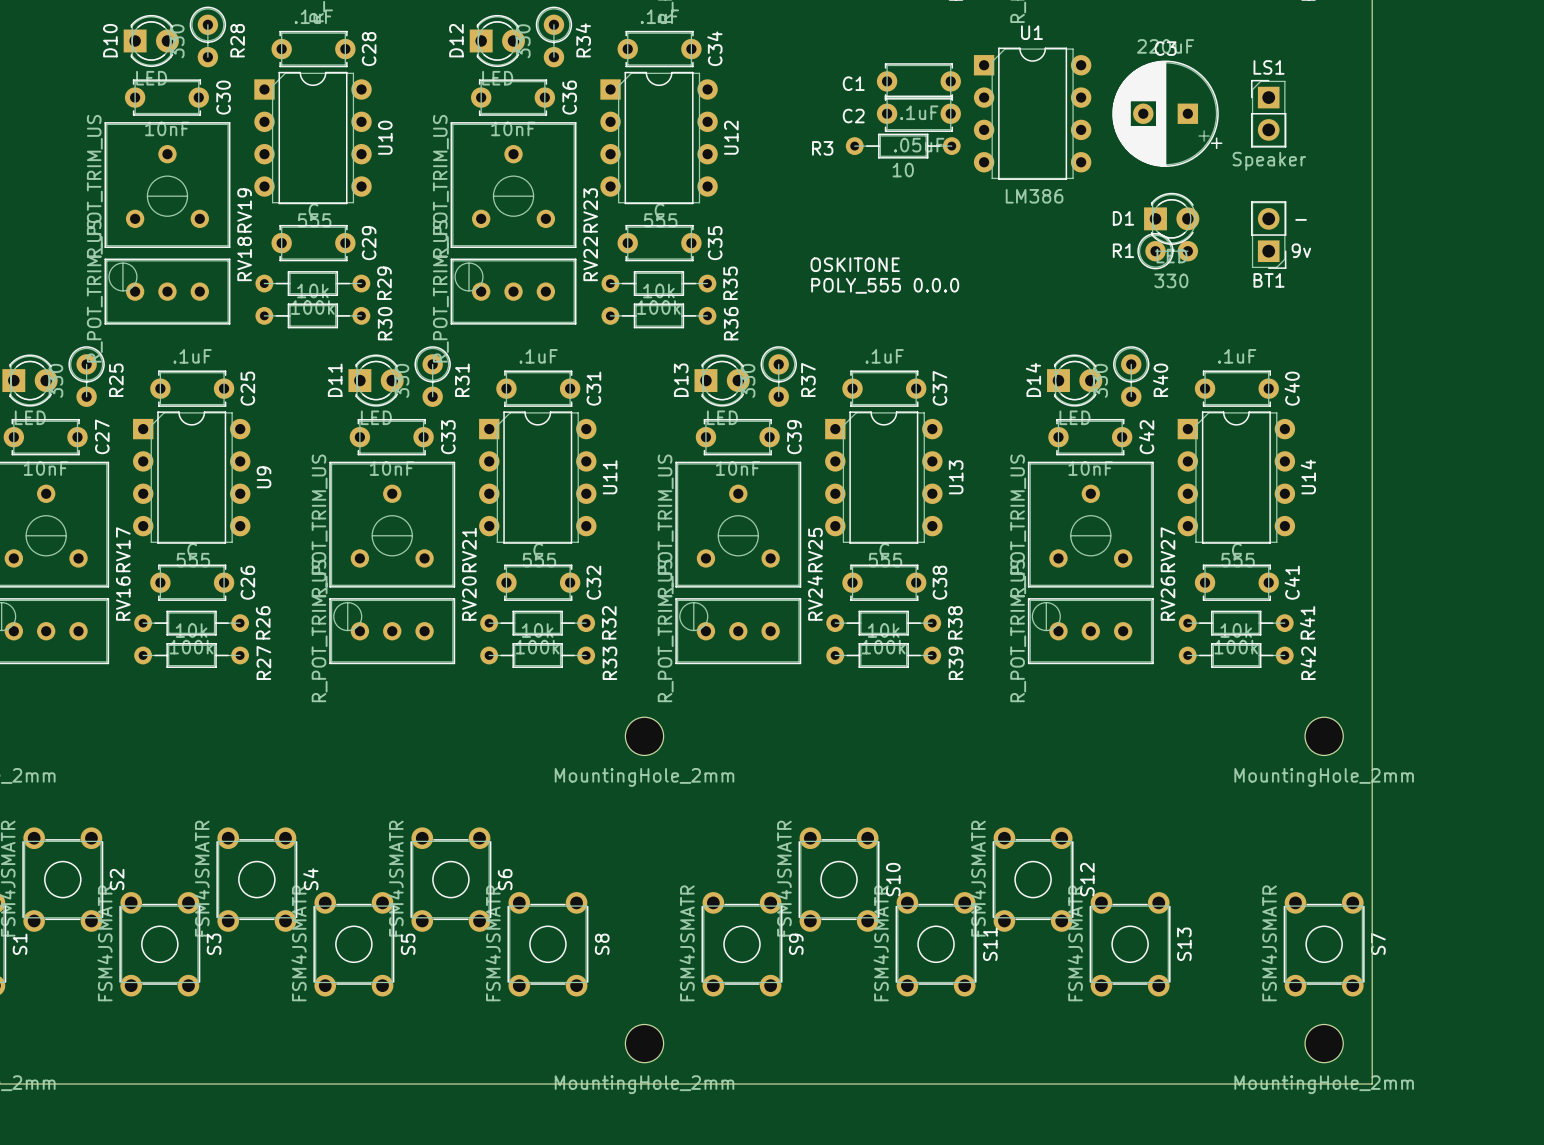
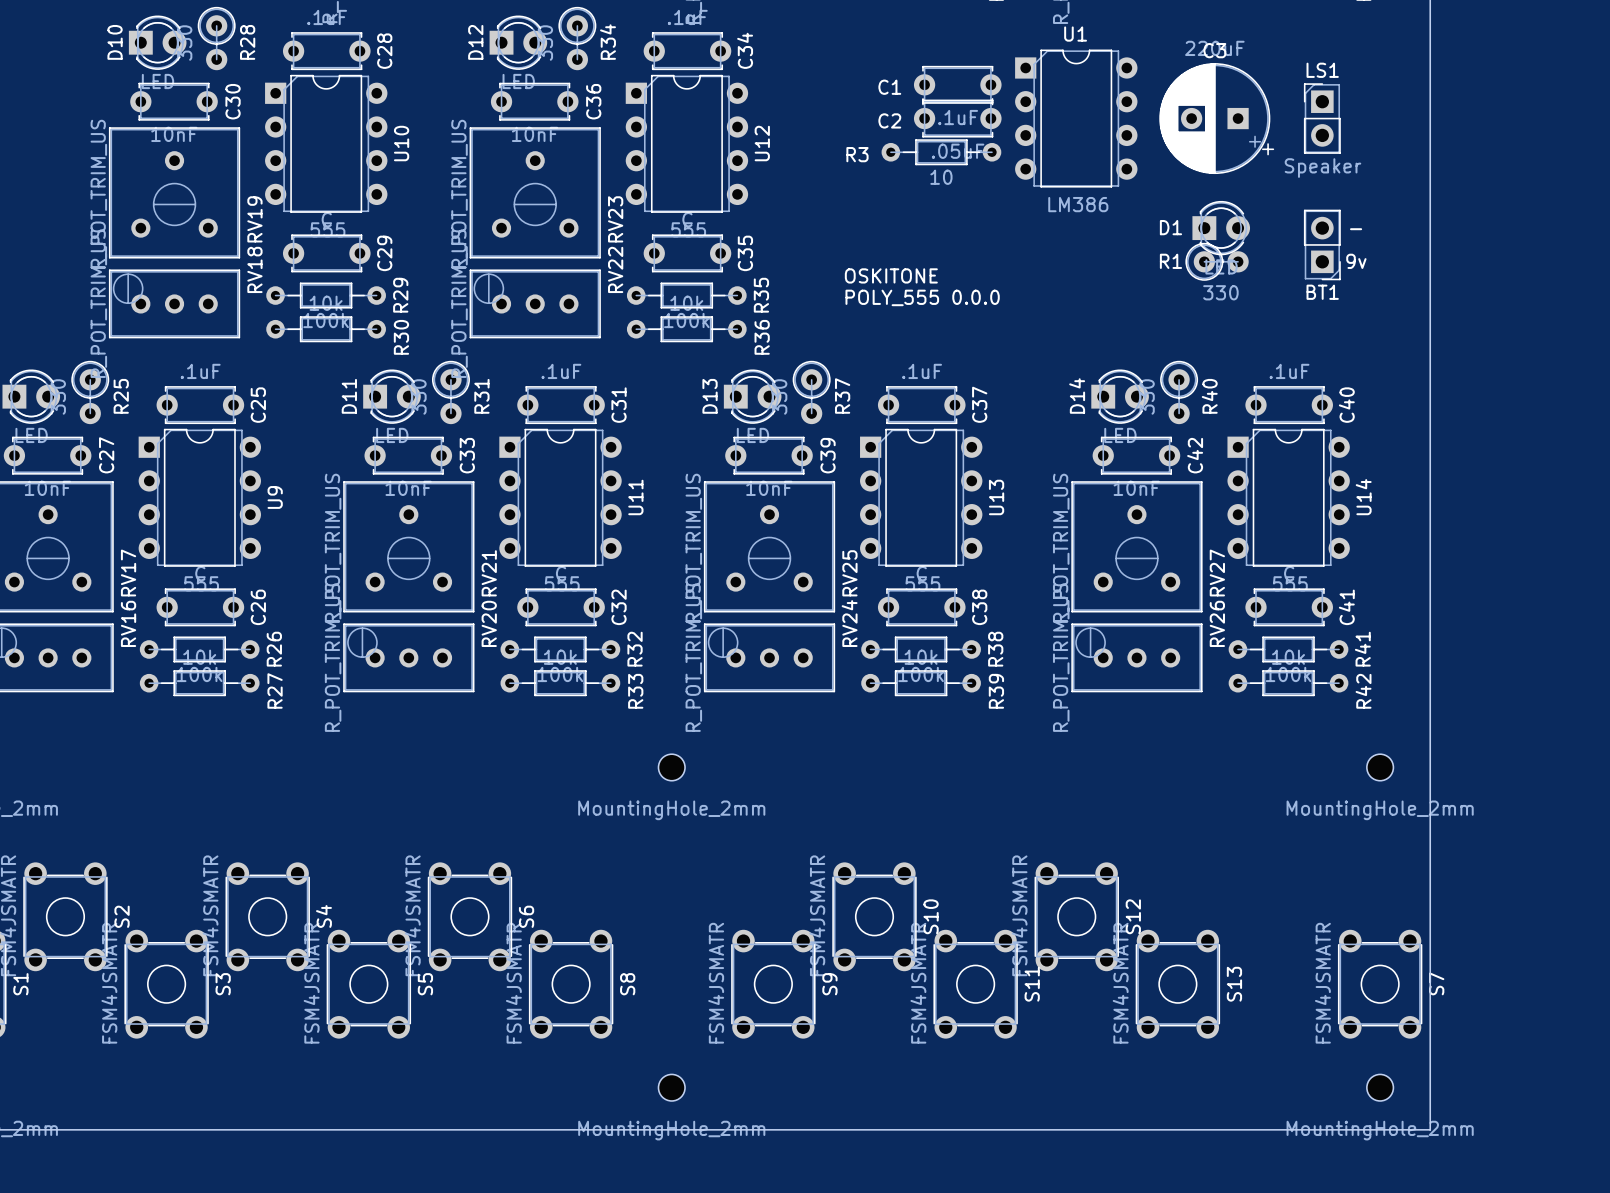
part footprint: [625, 717, 664, 756] -> [658, 754, 686, 781]
part footprint: [1305, 717, 1344, 756] -> [1366, 754, 1394, 781]
part footprint: [625, 1024, 664, 1063] -> [658, 1074, 686, 1101]
part footprint: [1305, 1024, 1344, 1063] -> [1366, 1074, 1394, 1101]

